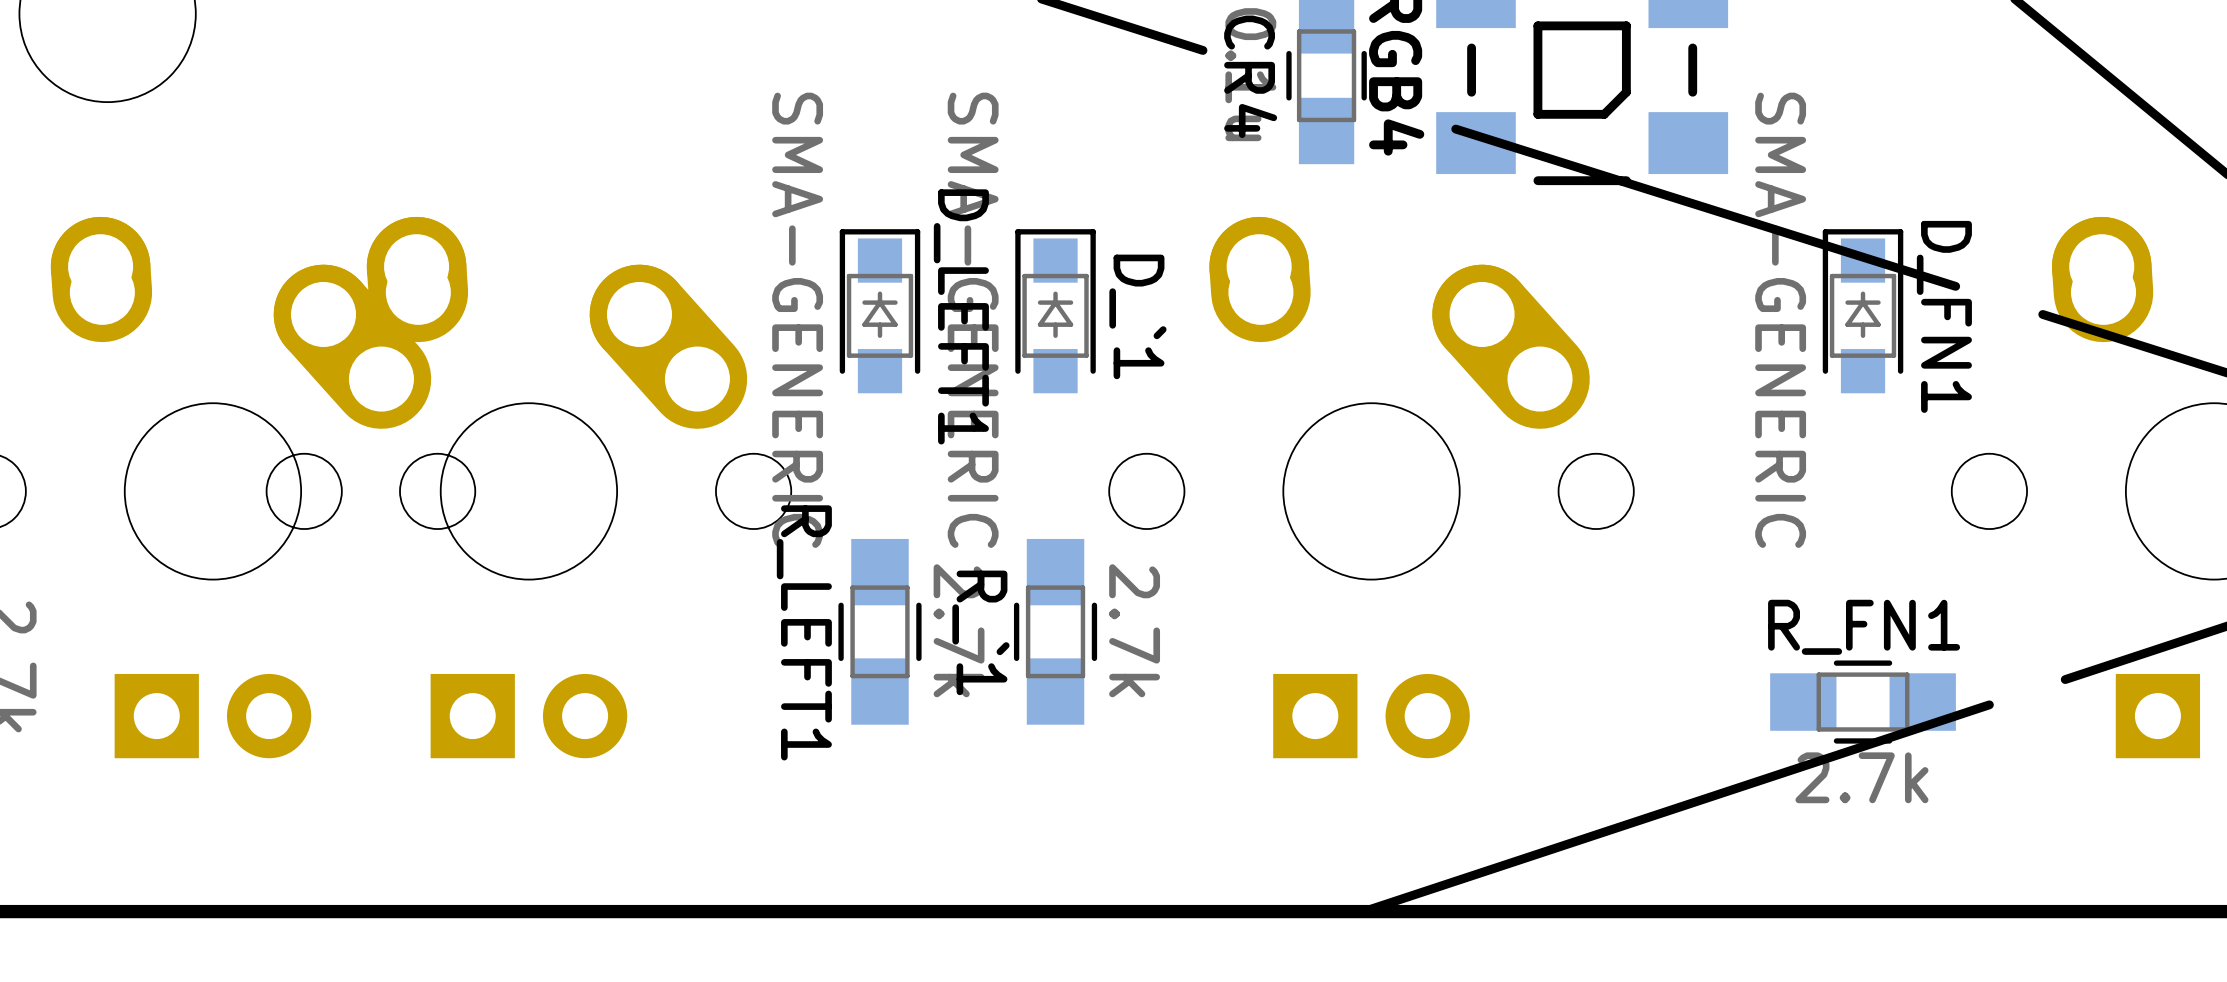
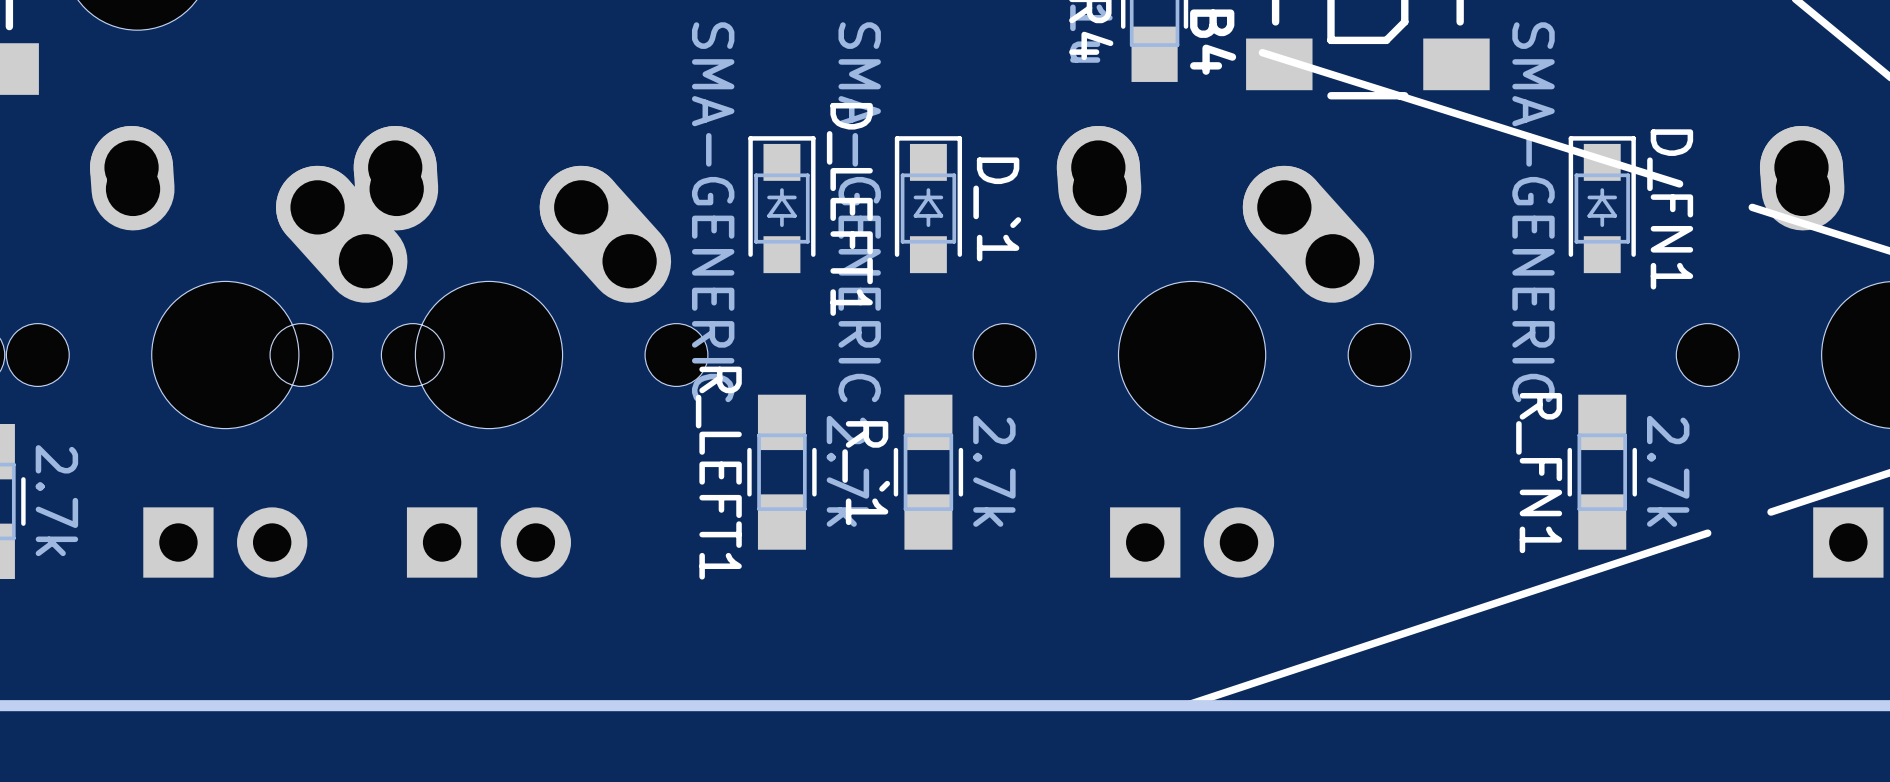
R_FN1 name position: R_FN1 (1864, 627) -> R_FN1 (1539, 473)
R_FN1 rotation: 0° (1863, 702) -> 90° clockwise (1602, 472)
R_FN1 value position: 2.7k (1861, 777) -> 2.7k (1668, 471)

